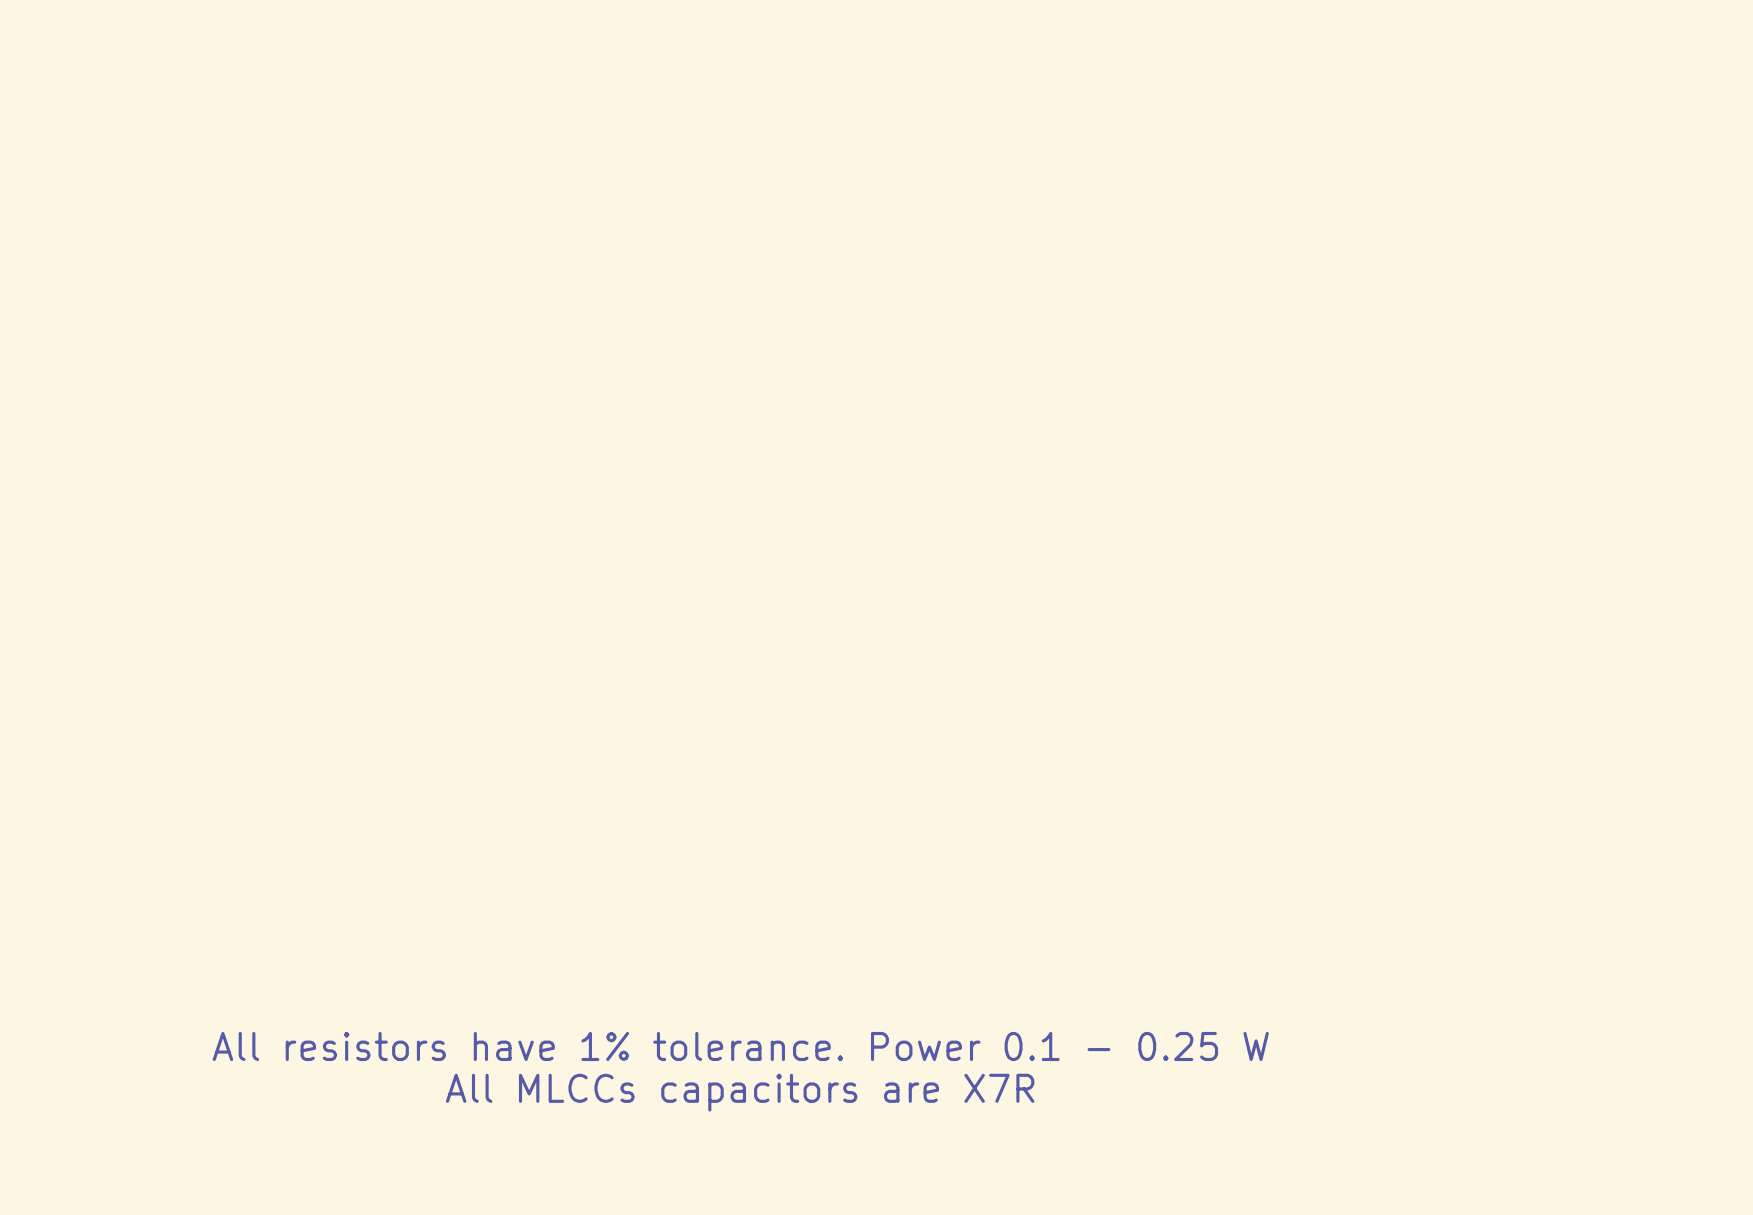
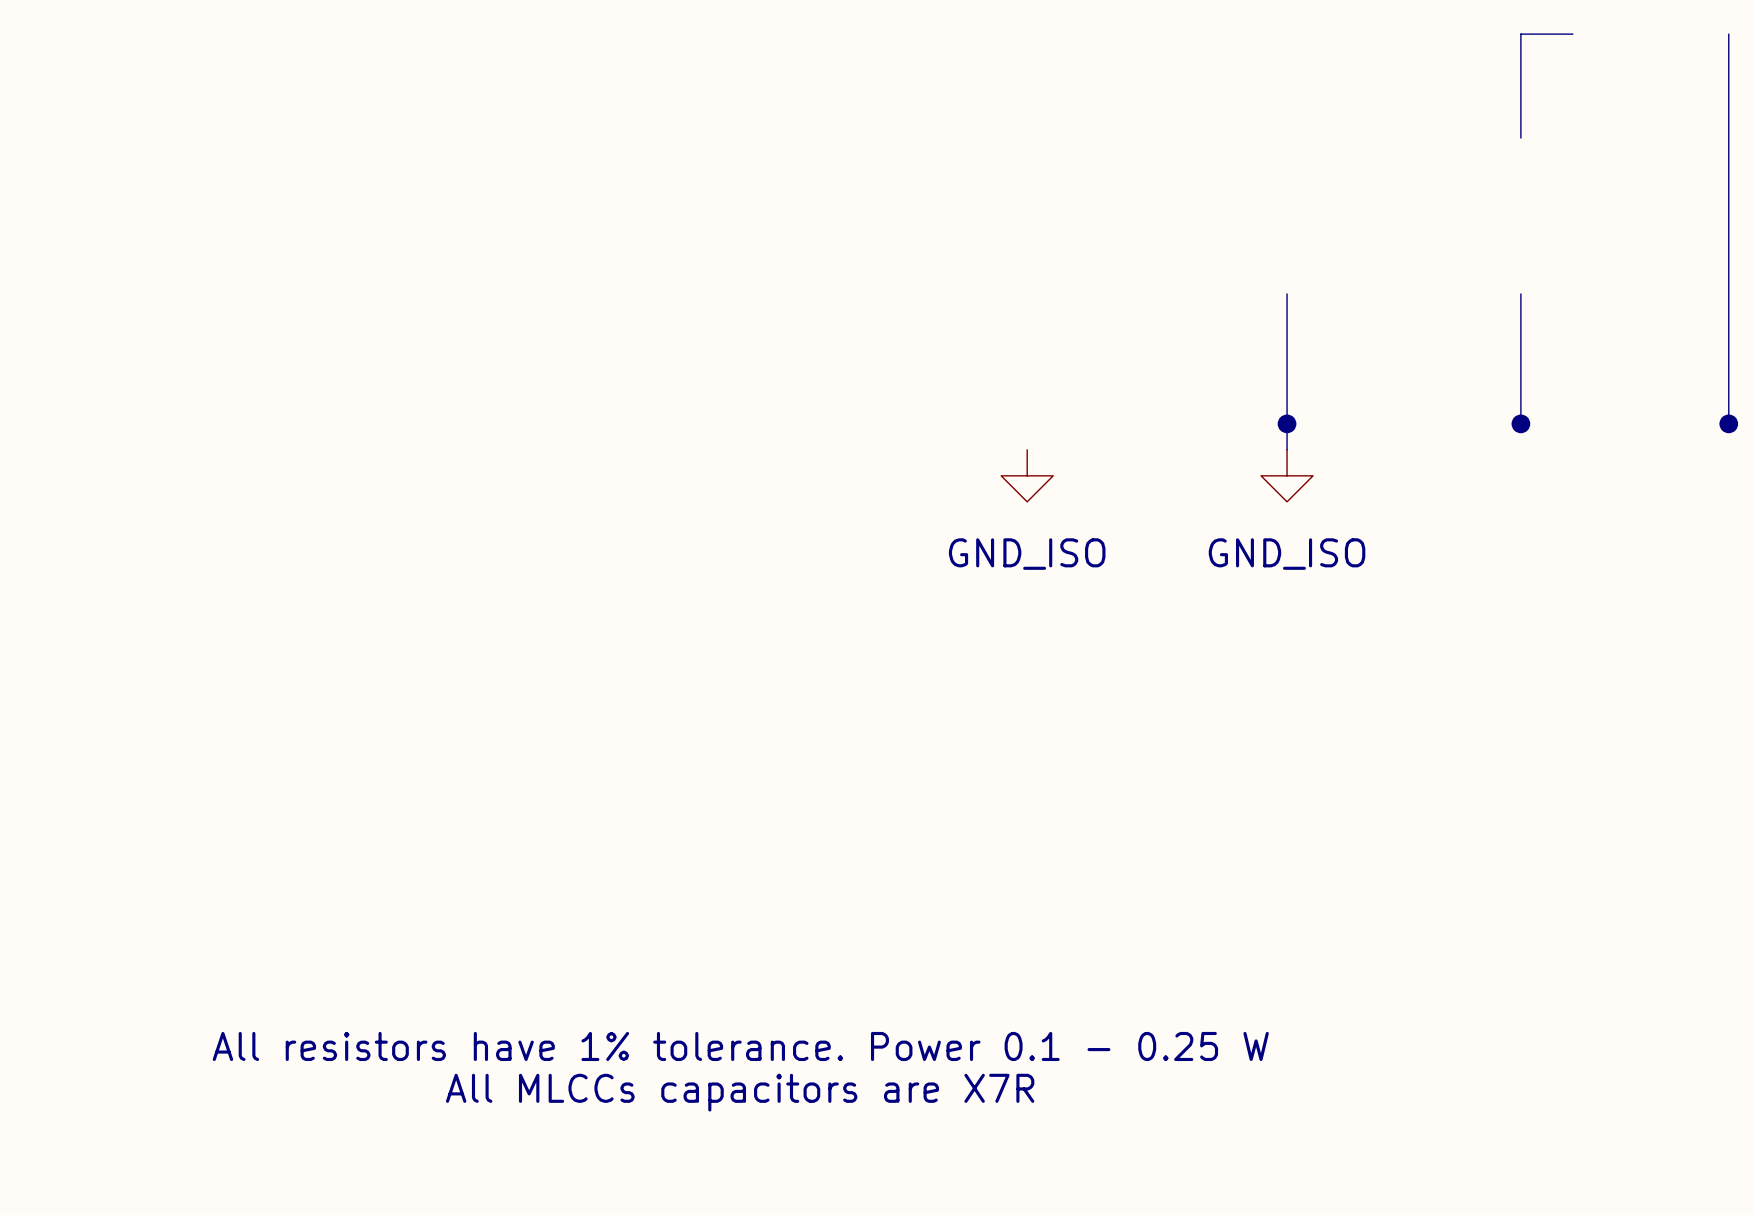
wire: none -> (1572, 34) (1520, 34) (1520, 138)
wire: none -> (1728, 34) (1728, 423)
wire: none -> (1287, 293) (1287, 449)
wire: none -> (1520, 293) (1520, 423)
junction: none -> (1287, 423)
junction: none -> (1520, 423)
junction: none -> (1728, 423)
power symbol: none -> GND_ISO (1027, 475)
power symbol: none -> GND_ISO (1287, 475)

